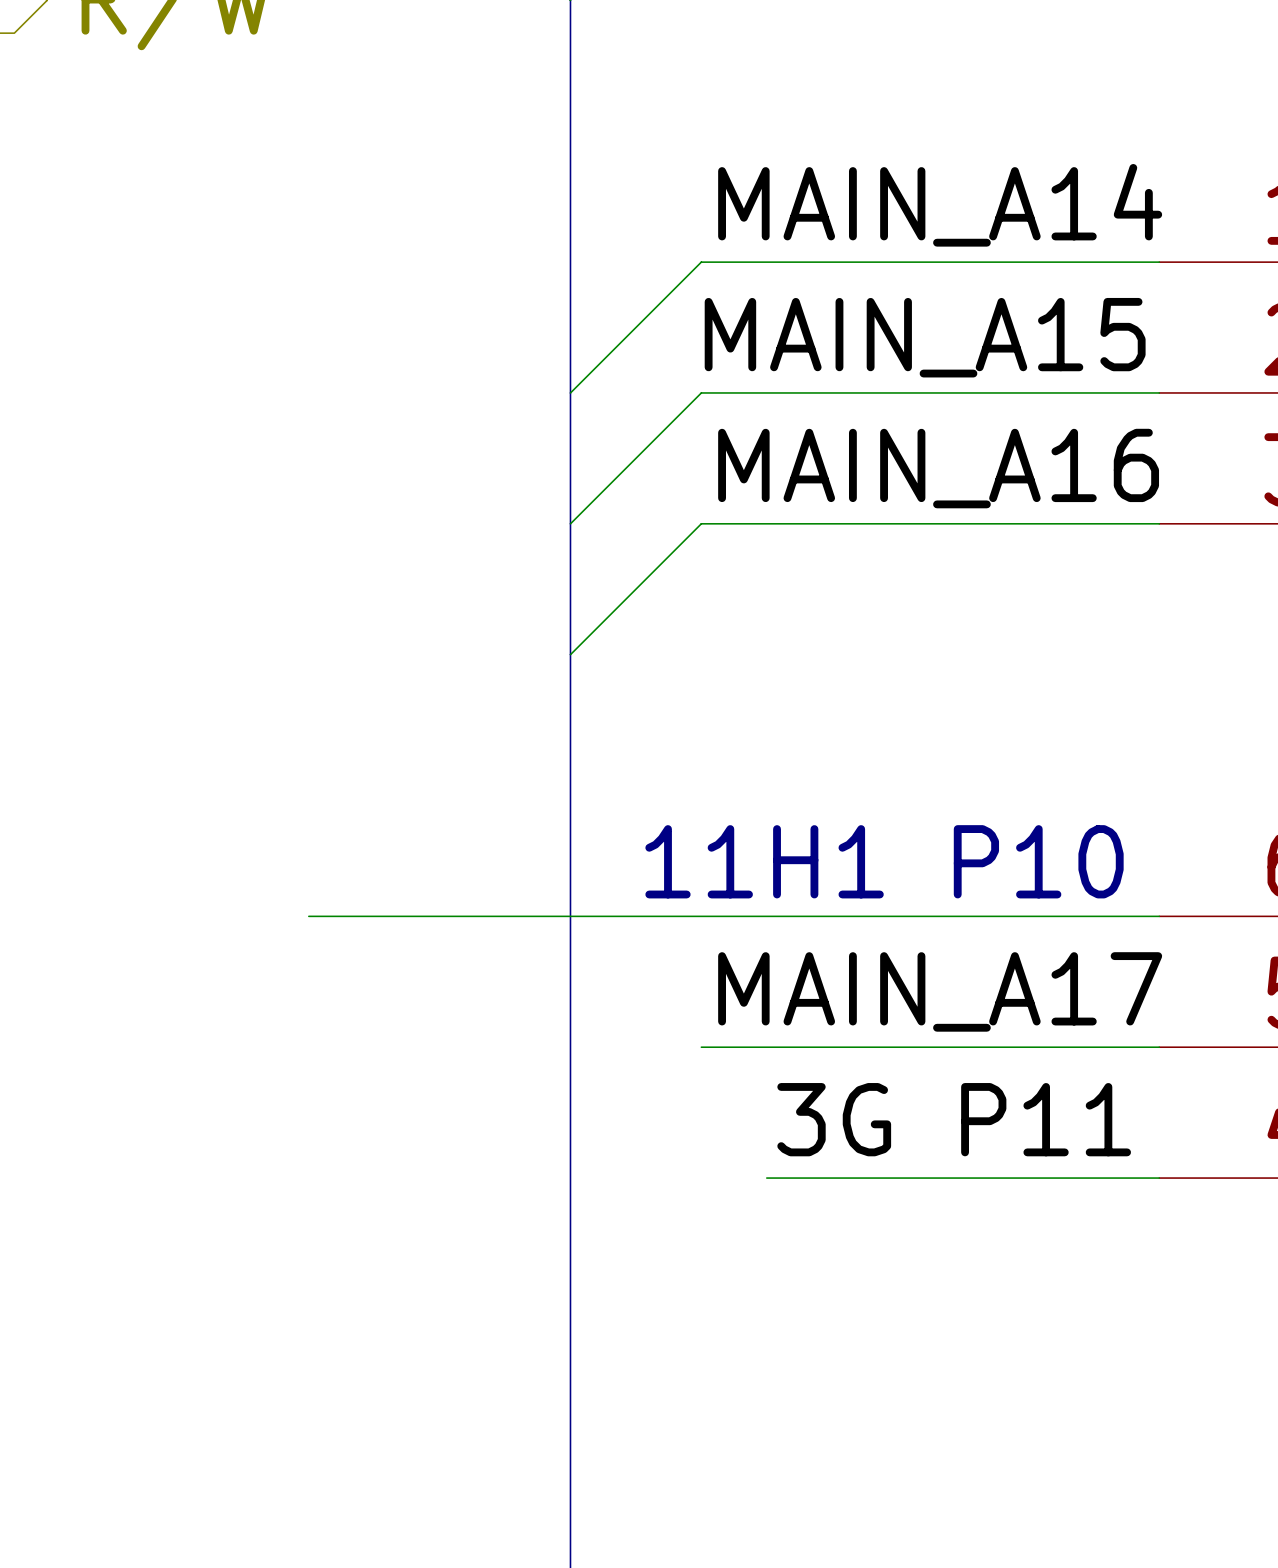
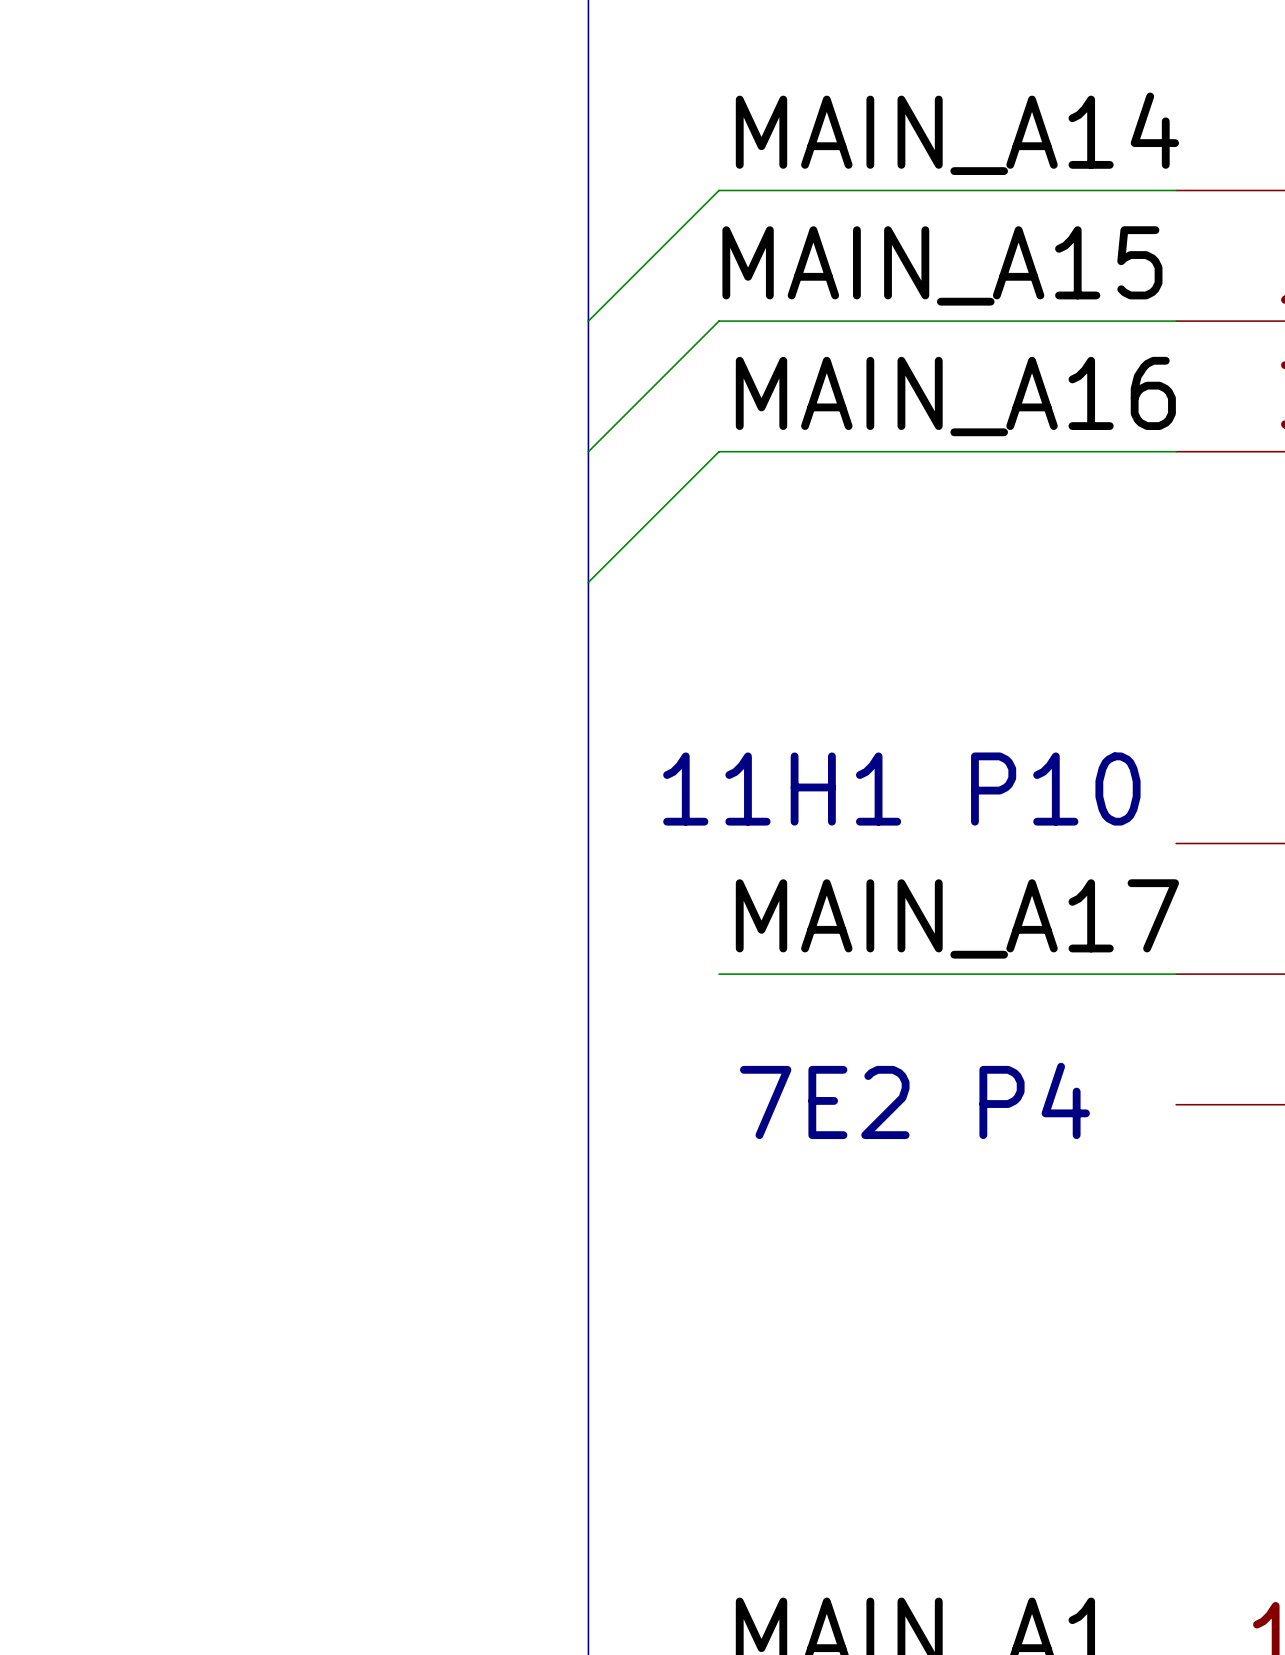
wire: (308, 916) (1159, 916) -> none
label: 3G P11 (954, 1119) -> none
text: none -> 7E2 P4 (914, 1100)
wire: (766, 1178) (1159, 1178) -> none

